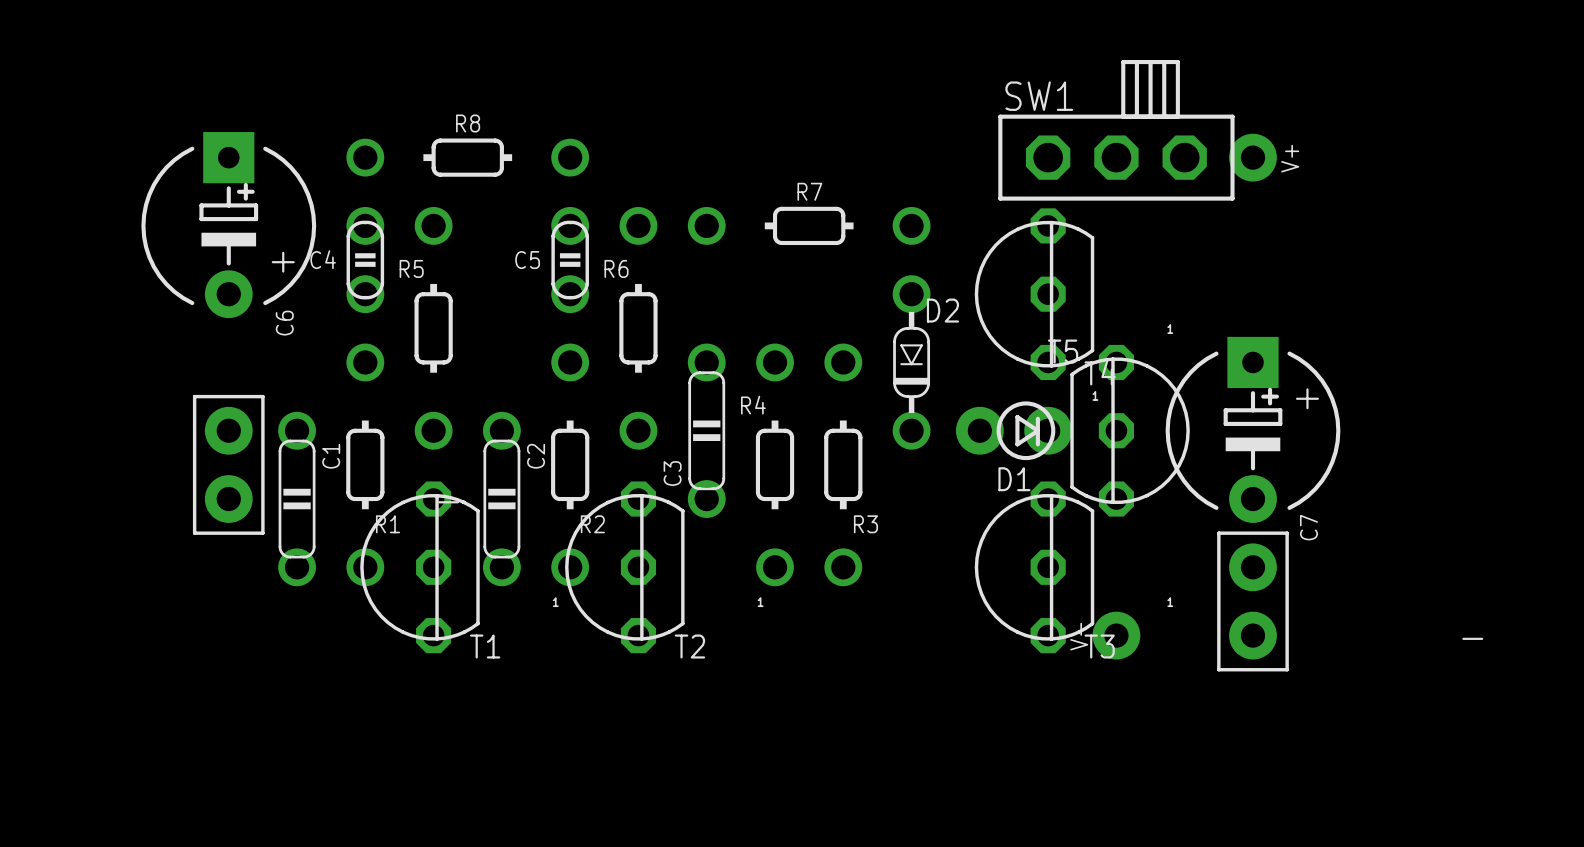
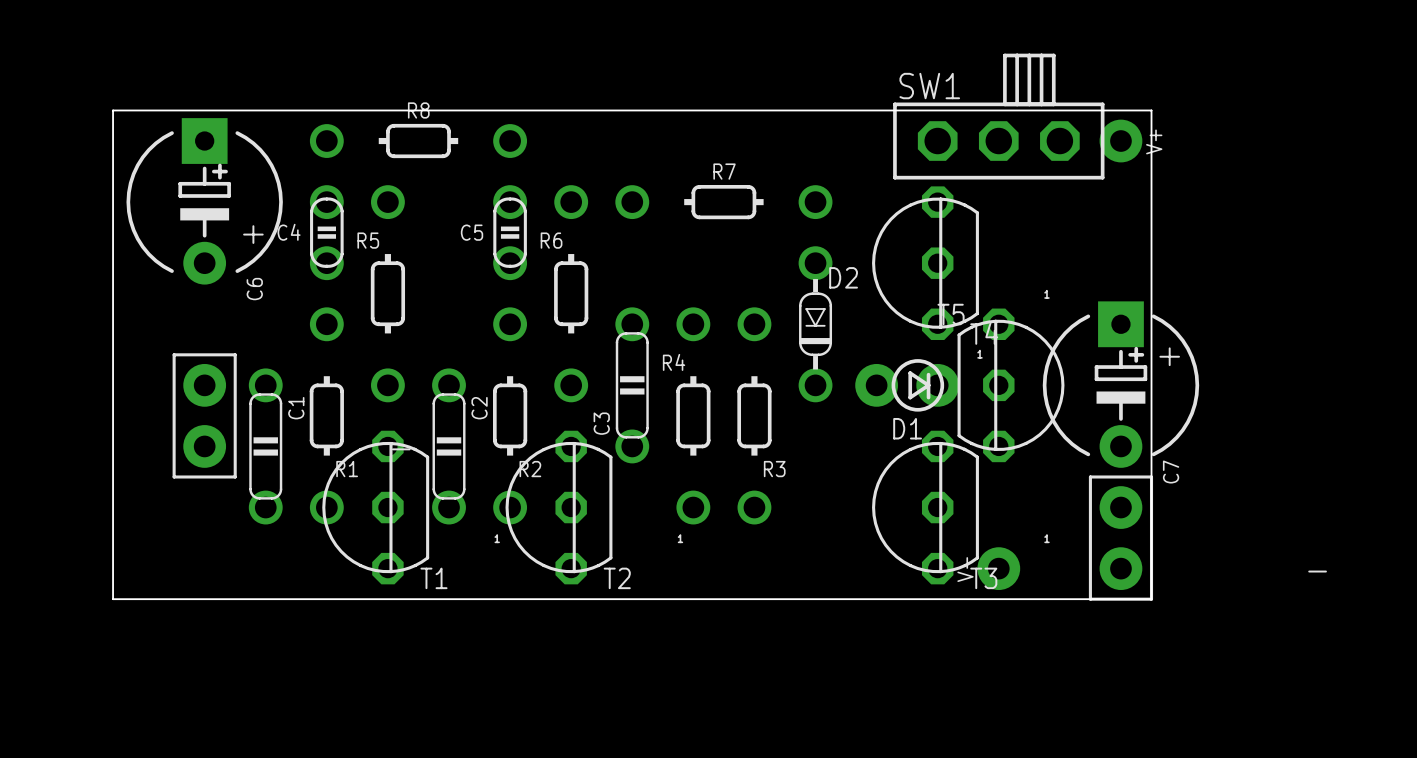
board edge: none -> (113, 110) (1151, 110) (1151, 599) (113, 599) (113, 110)

